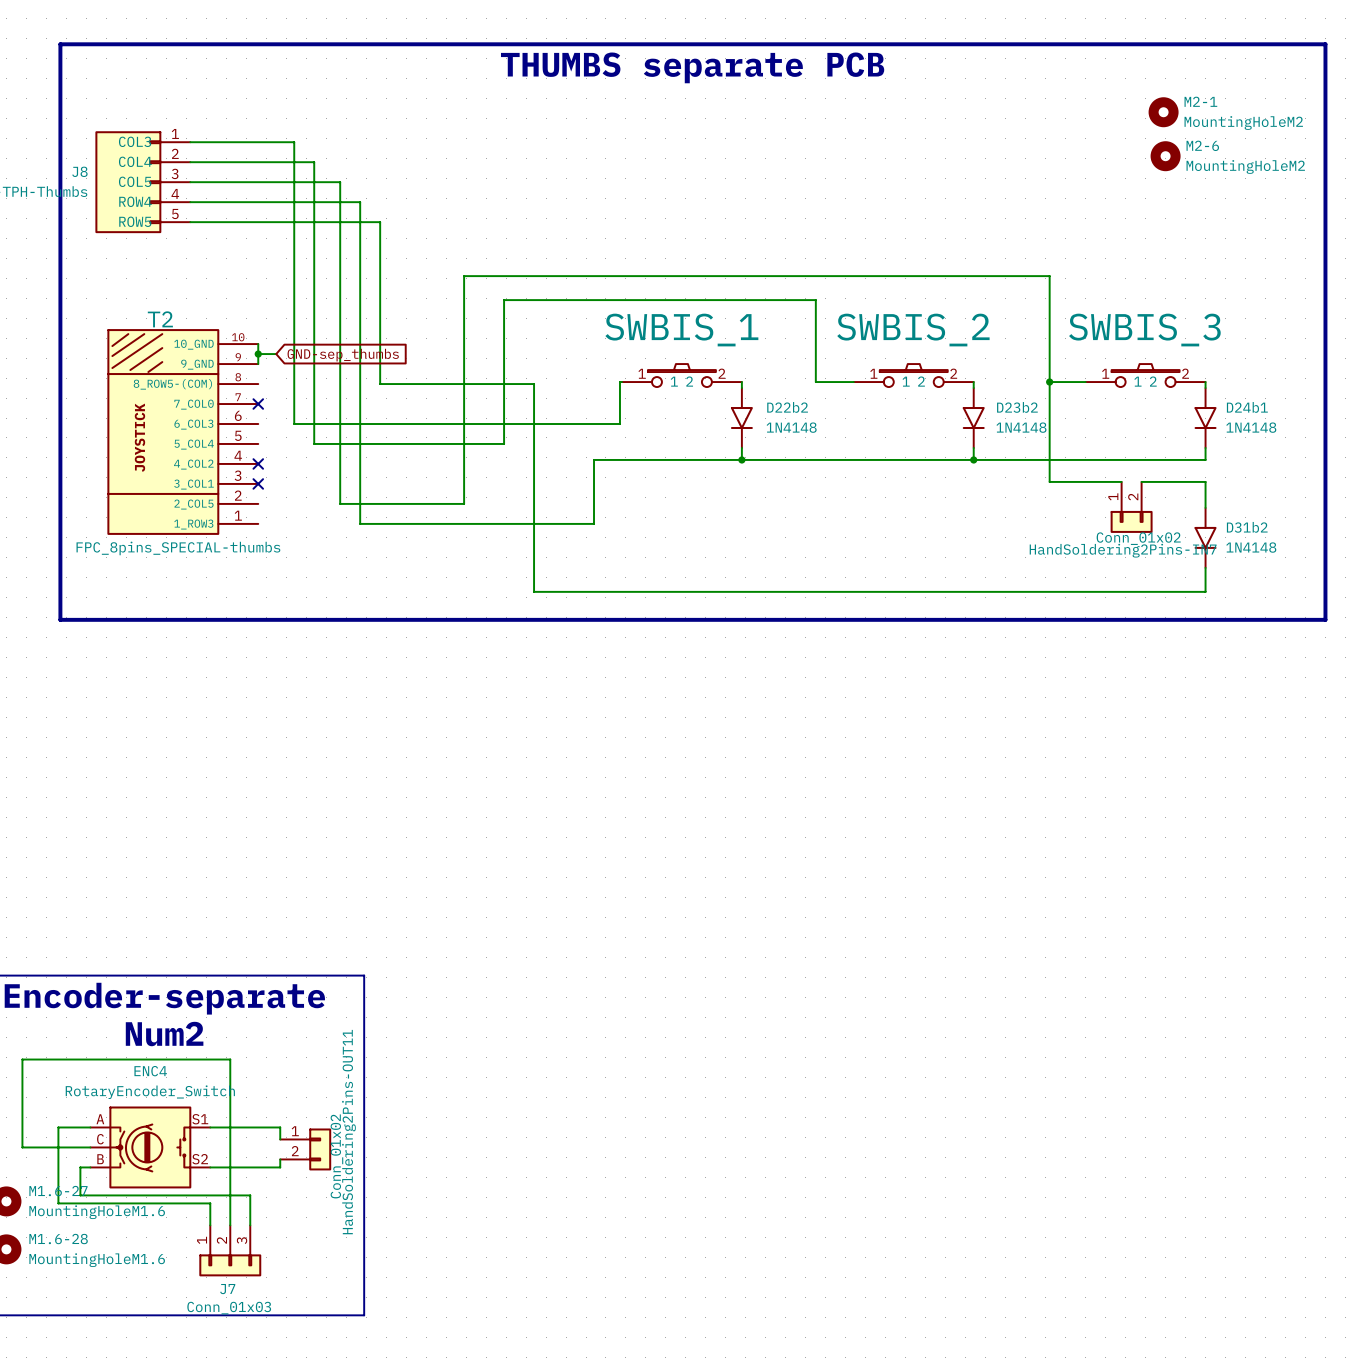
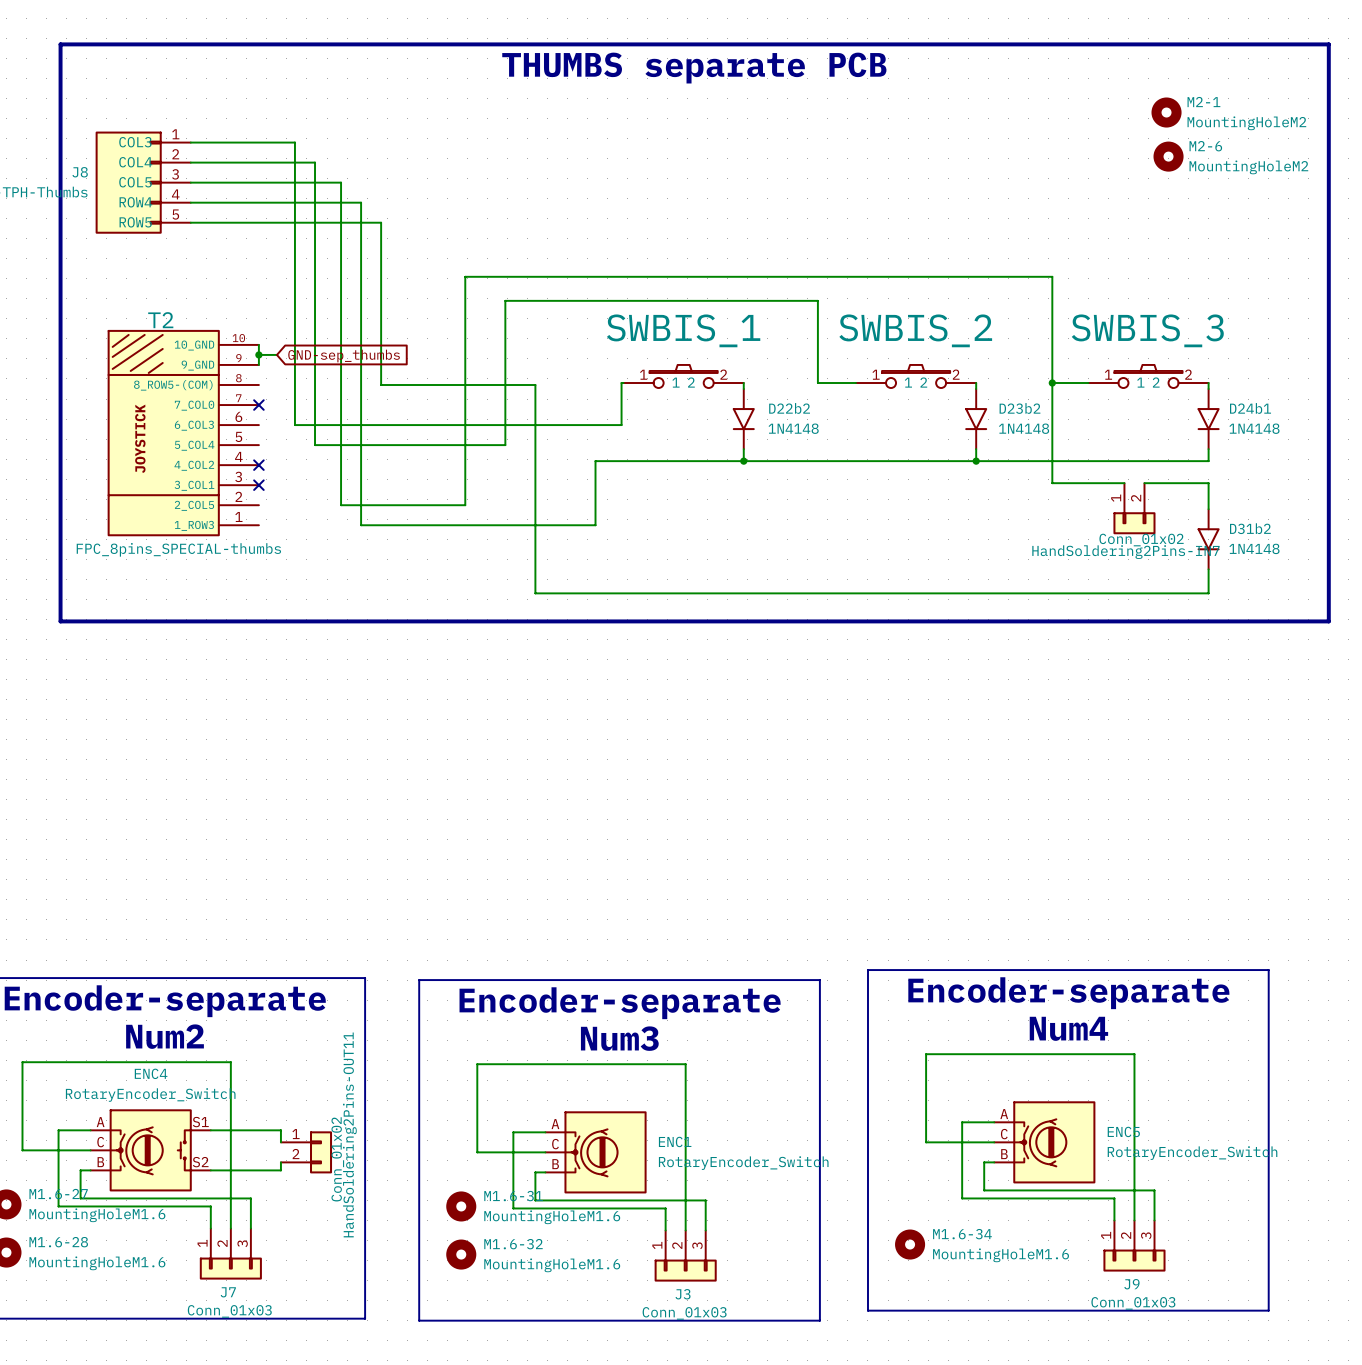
line: none -> (867, 970) (1268, 970) (1268, 1310) (867, 1310) (867, 970)
line: none -> (419, 980) (819, 980) (819, 1320) (419, 1320) (419, 980)
text: none -> Encoder-separate (1068, 993)
text: none -> Encoder-separate (620, 1003)
text: none -> Num4 (1068, 1028)
text: none -> Num3 (619, 1038)
wire: none -> (994, 1122) (962, 1122) (962, 1198) (1114, 1198) (1114, 1220)
wire: none -> (545, 1132) (513, 1132) (513, 1208) (665, 1208) (665, 1230)
wire: none -> (994, 1142) (926, 1142) (926, 1054) (1134, 1054) (1134, 1220)
ENC5: none -> RotaryEncoder_Switch (1044, 1142)
wire: none -> (545, 1152) (477, 1152) (477, 1064) (685, 1064) (685, 1230)
ENC1: none -> RotaryEncoder_Switch (596, 1152)
wire: none -> (994, 1162) (984, 1162) (984, 1190) (1154, 1190) (1154, 1220)
wire: none -> (545, 1172) (535, 1172) (535, 1200) (705, 1200) (705, 1230)
M1.6-31: none -> MountingHoleM1.6 (461, 1206)
M1.6-34: none -> MountingHoleM1.6 (910, 1244)
J9: none -> Conn_01x03 (1134, 1246)
M1.6-32: none -> MountingHoleM1.6 (461, 1254)
J3: none -> Conn_01x03 (685, 1256)

